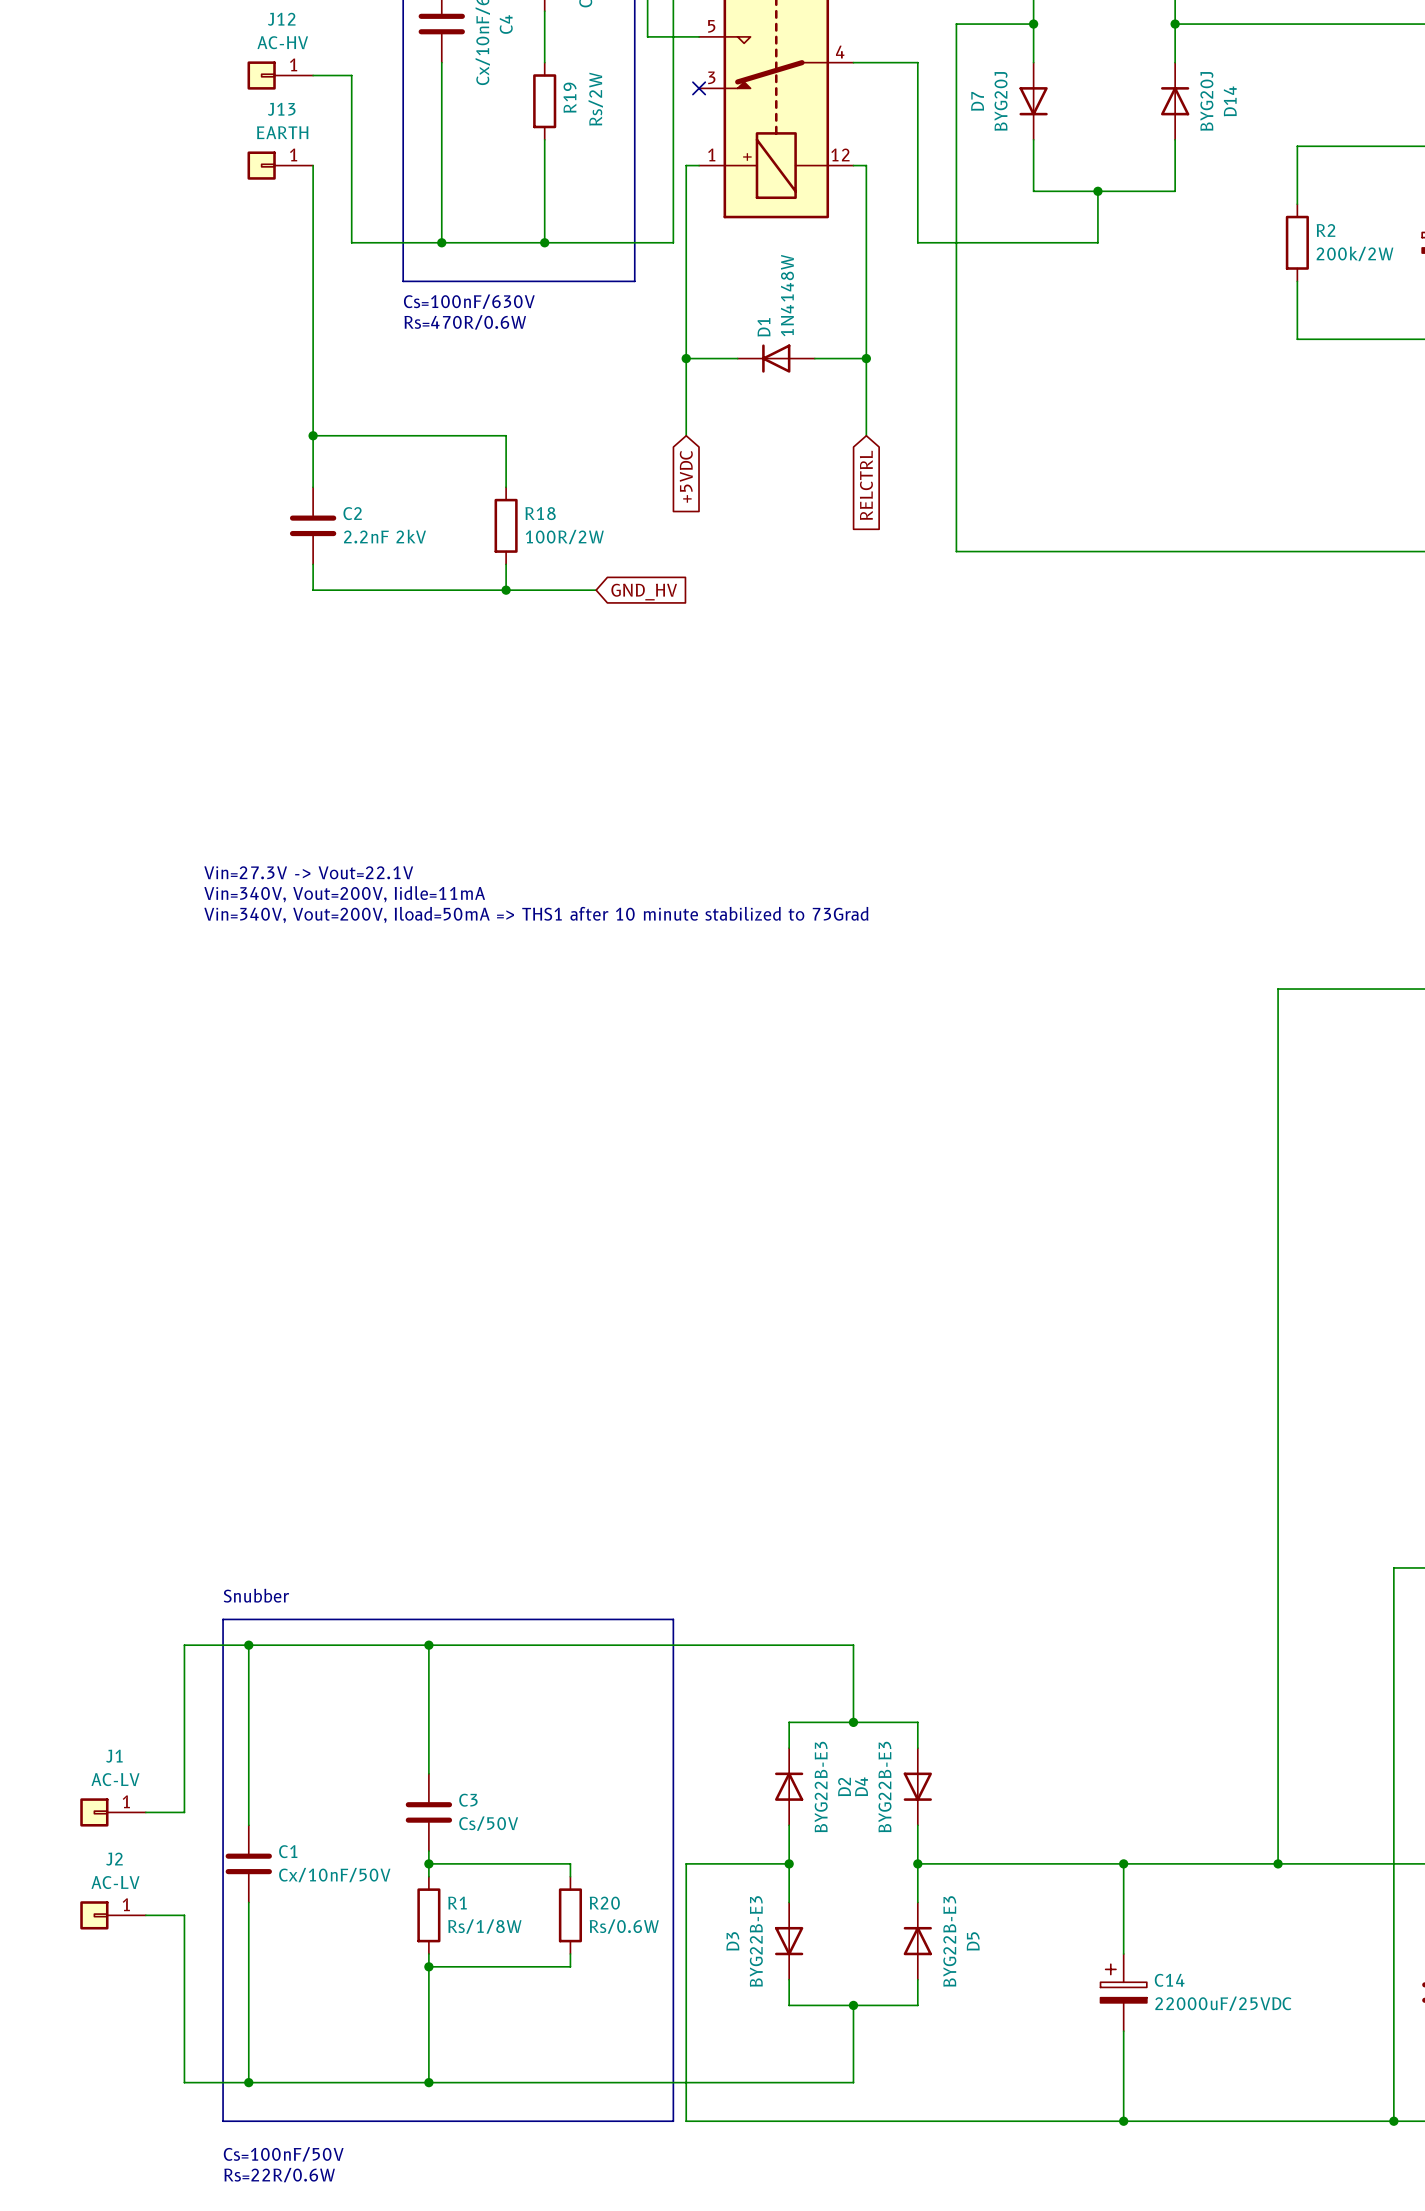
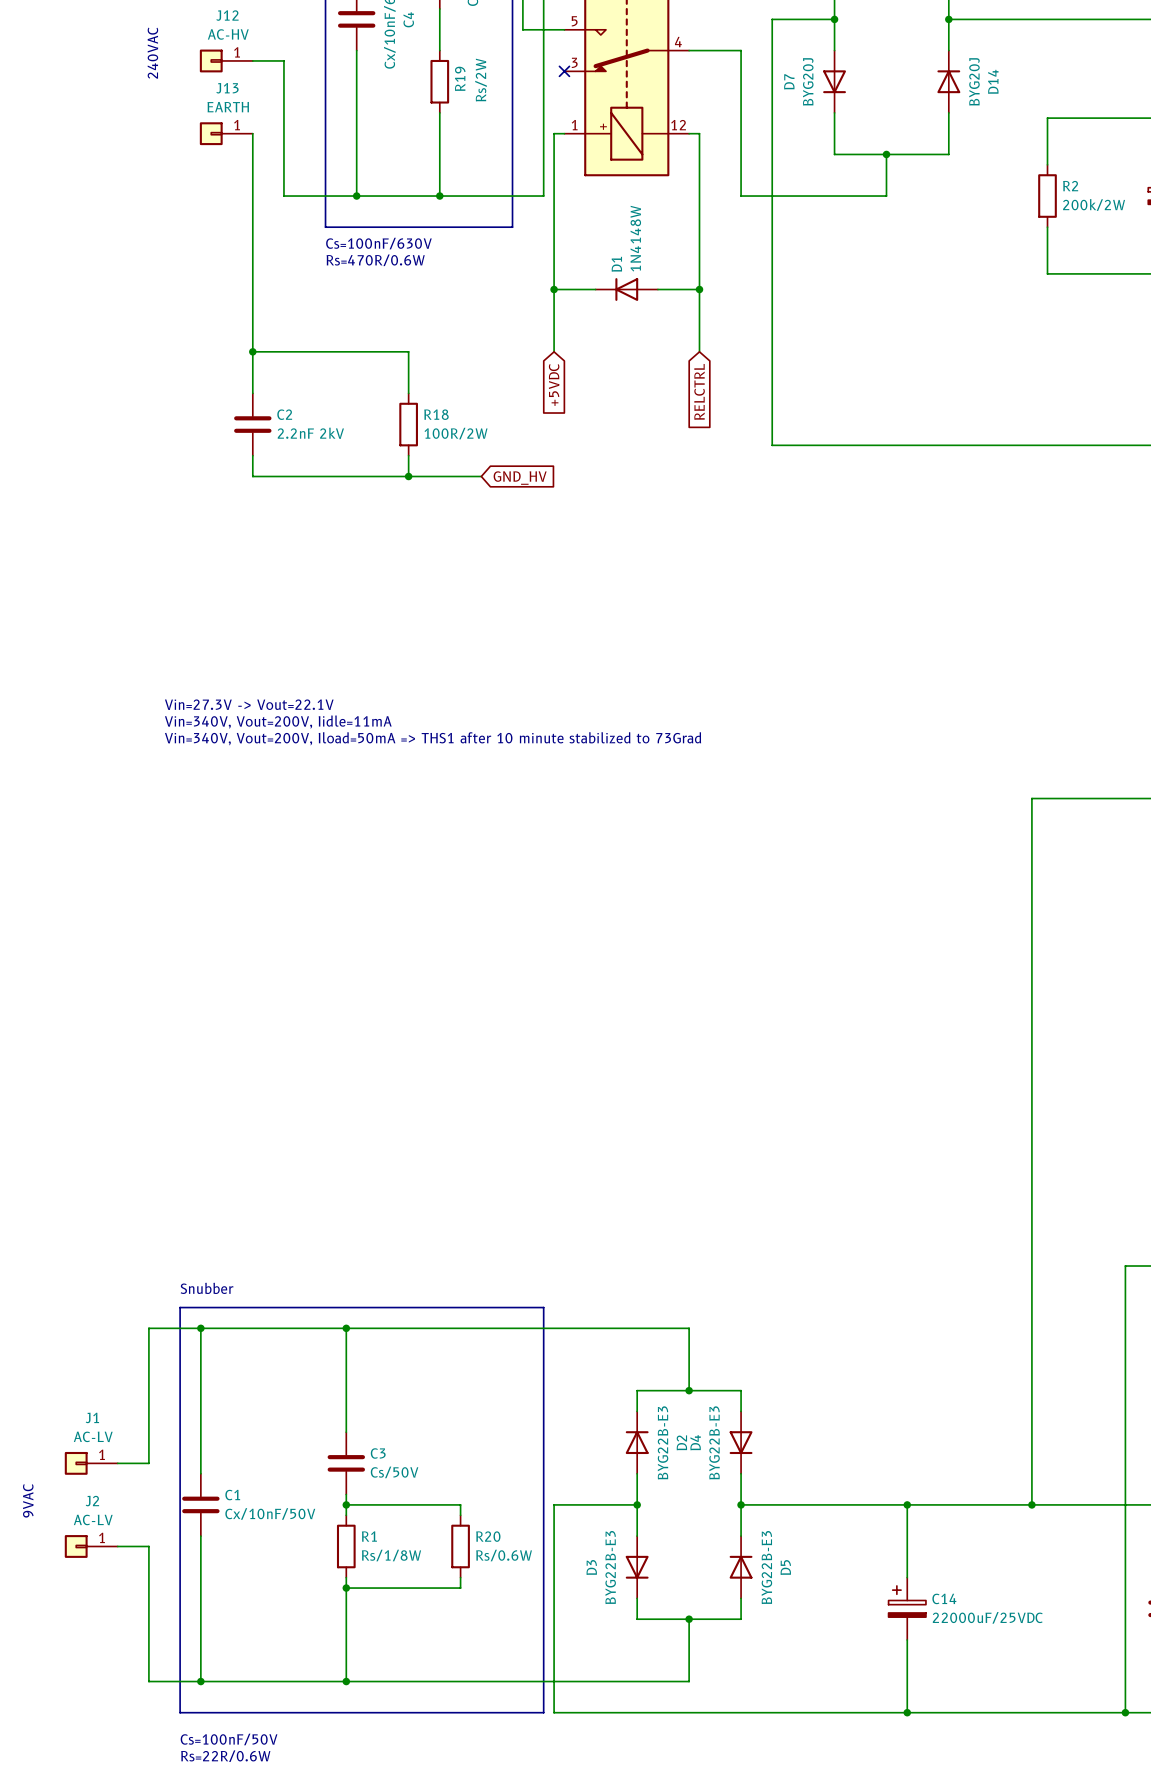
text: none -> 240VAC (152, 53)
text: none -> 9VAC (28, 1500)

